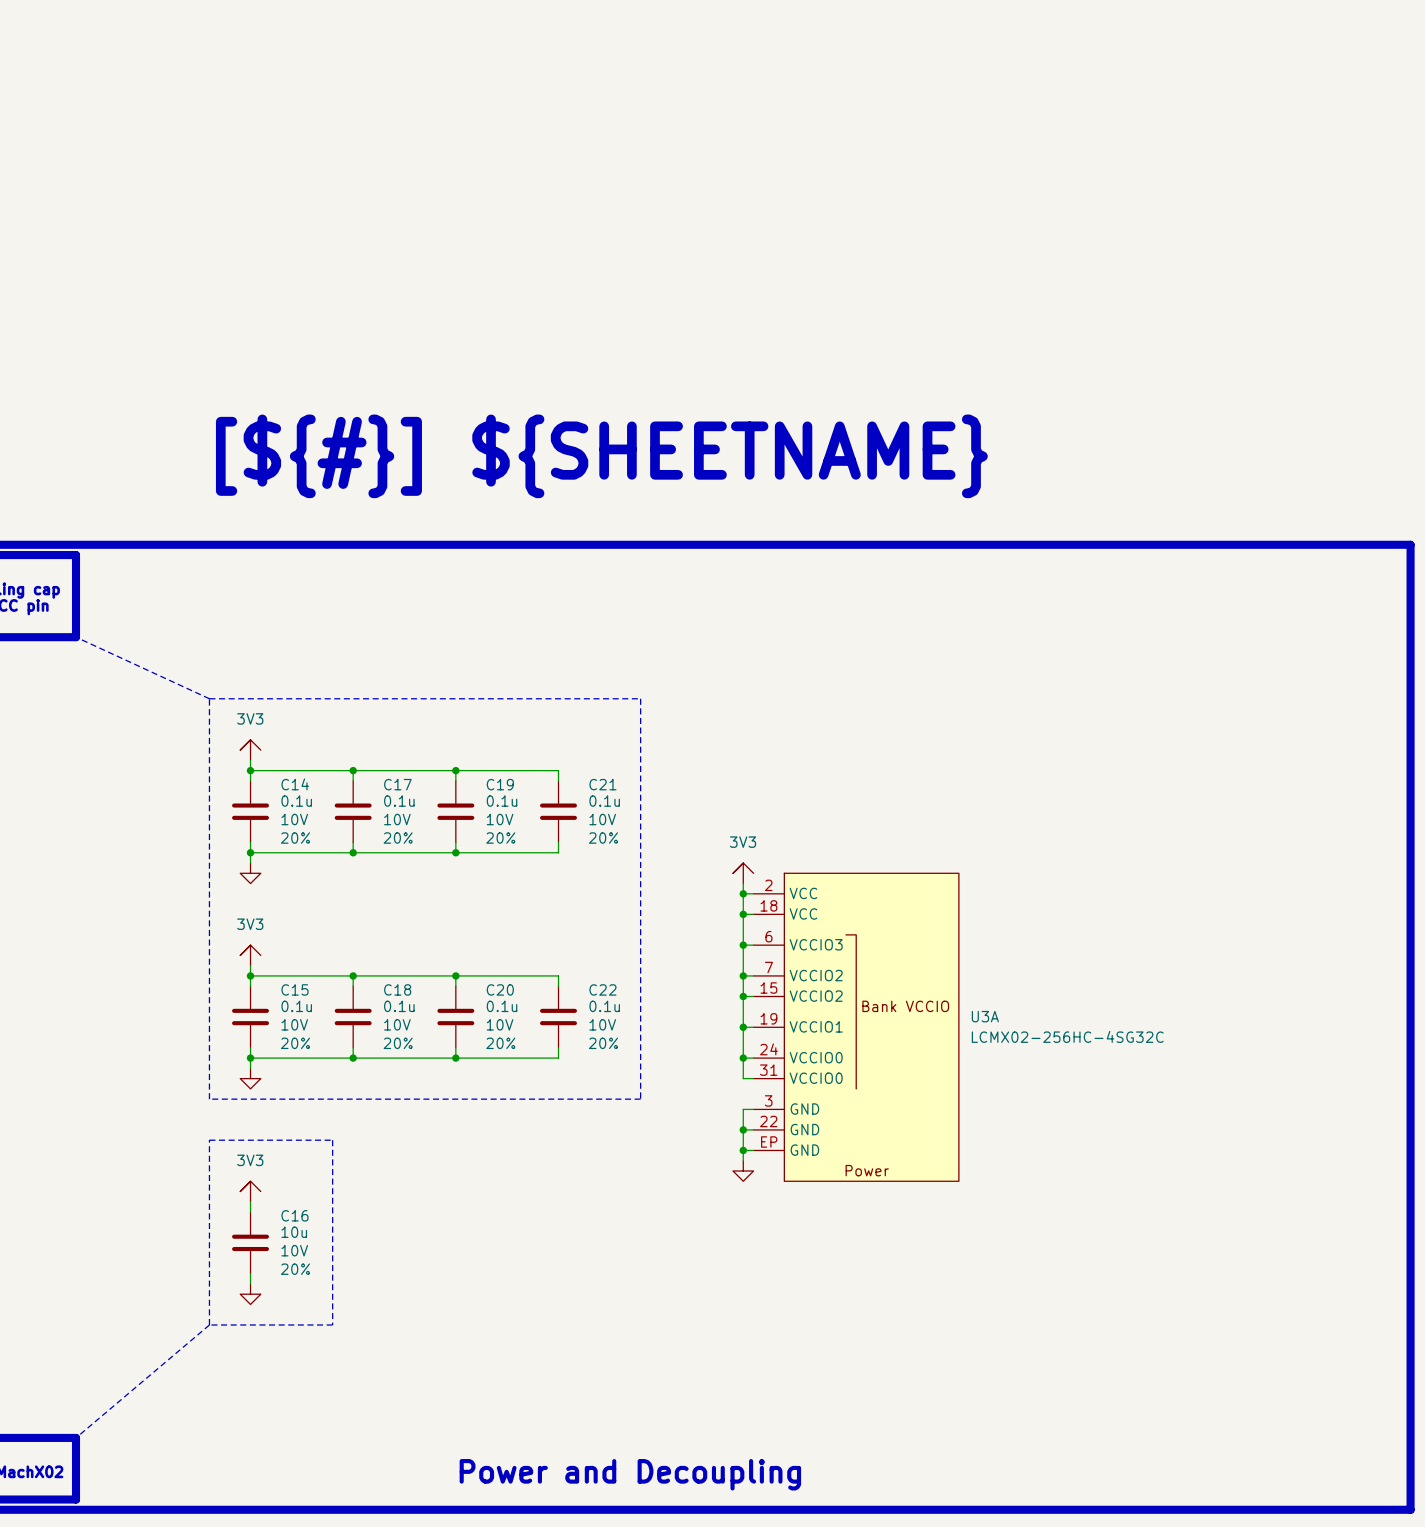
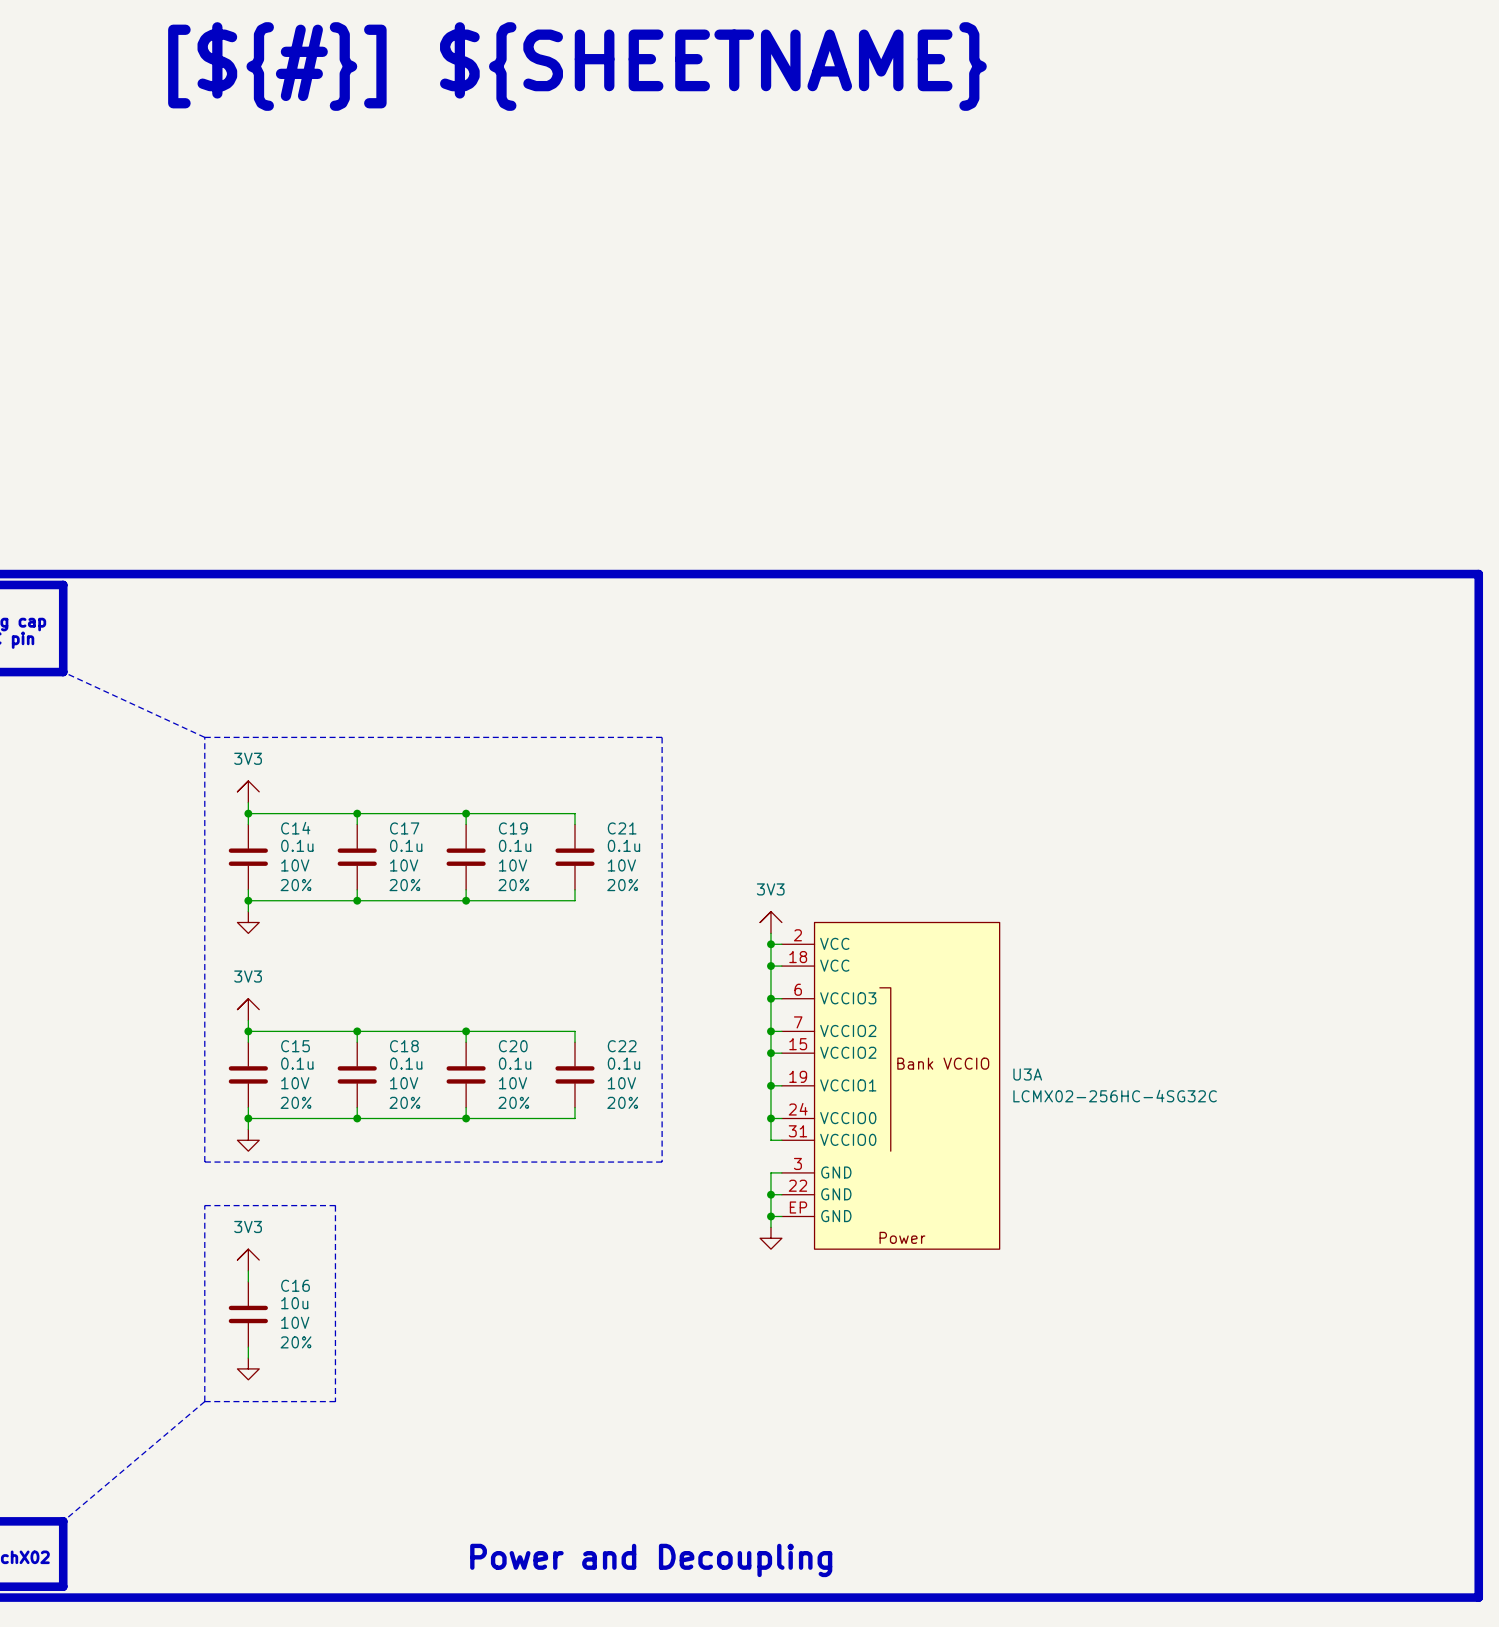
text: none -> [${#}] ${SHEETNAME} (577, 66)
text: [${#}] ${SHEETNAME} (601, 456) -> none

